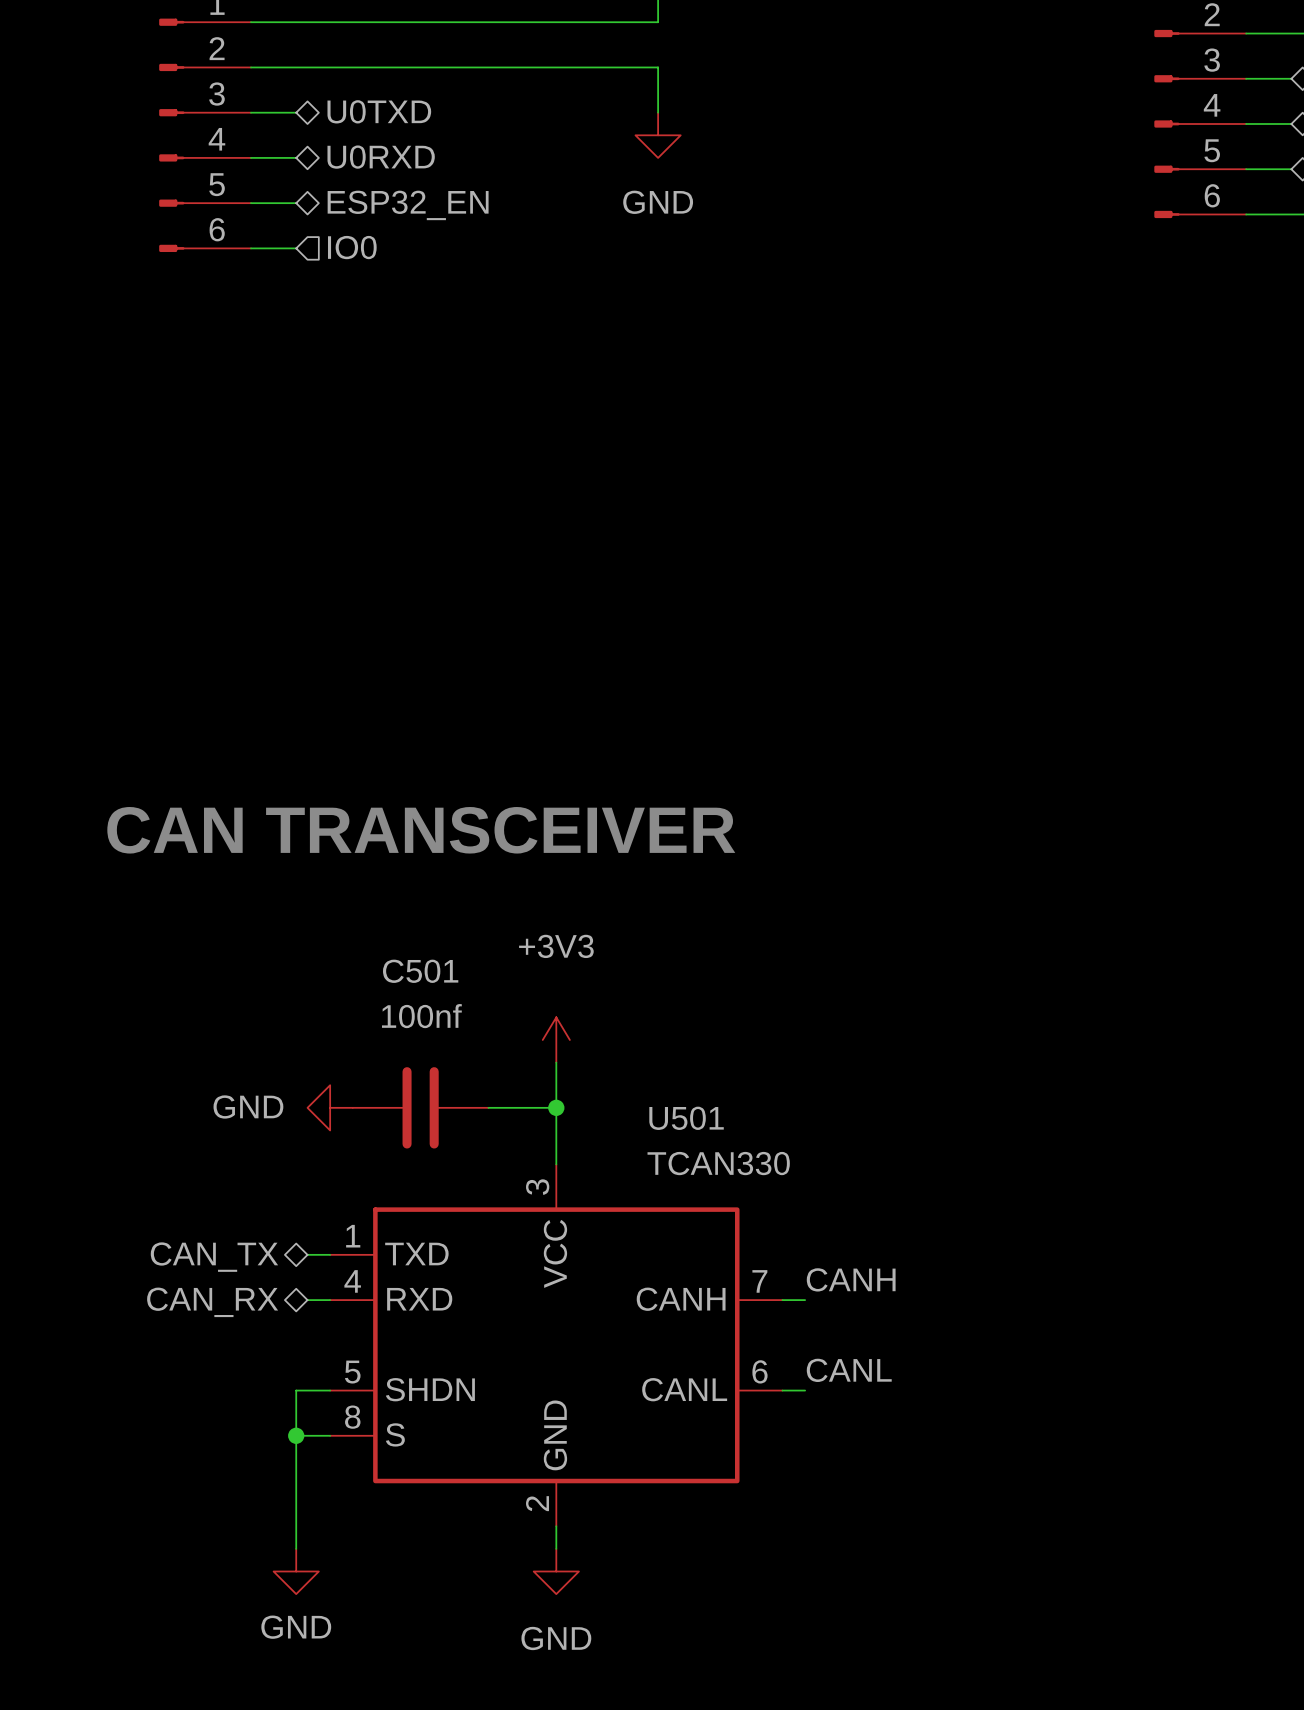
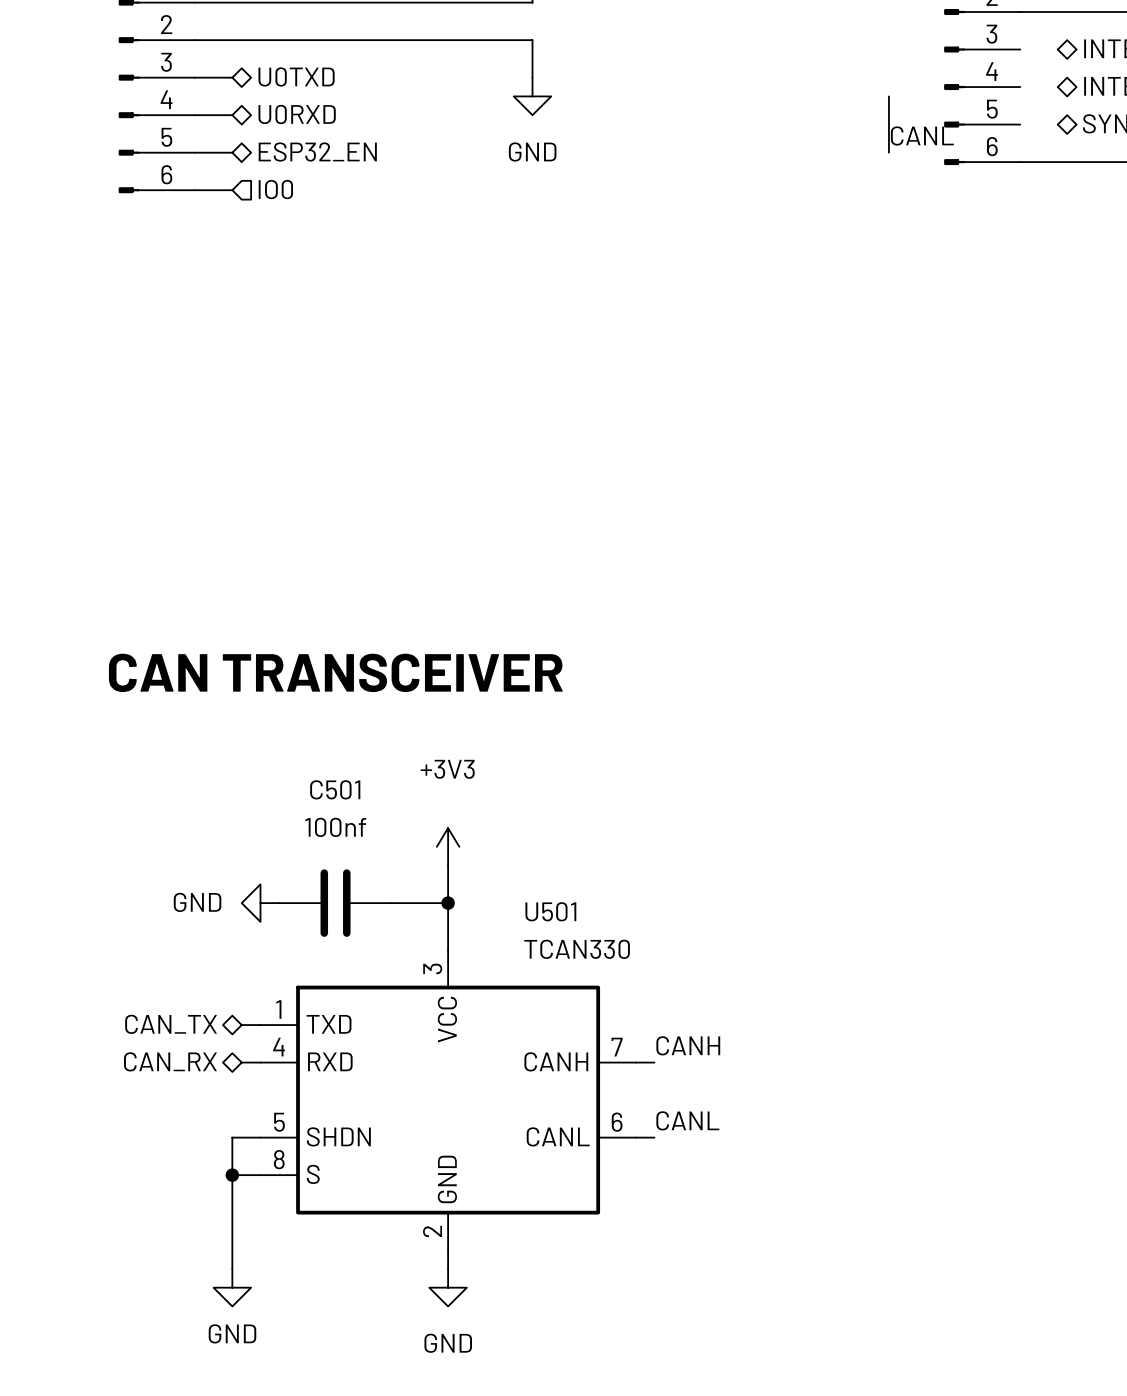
wire: (1246, 78) (1291, 78) -> none
wire: (1246, 124) (1291, 124) -> none
wire: none -> (888, 96) (888, 152)
wire: (1246, 169) (1291, 169) -> none
label: none -> CANL (922, 135)

